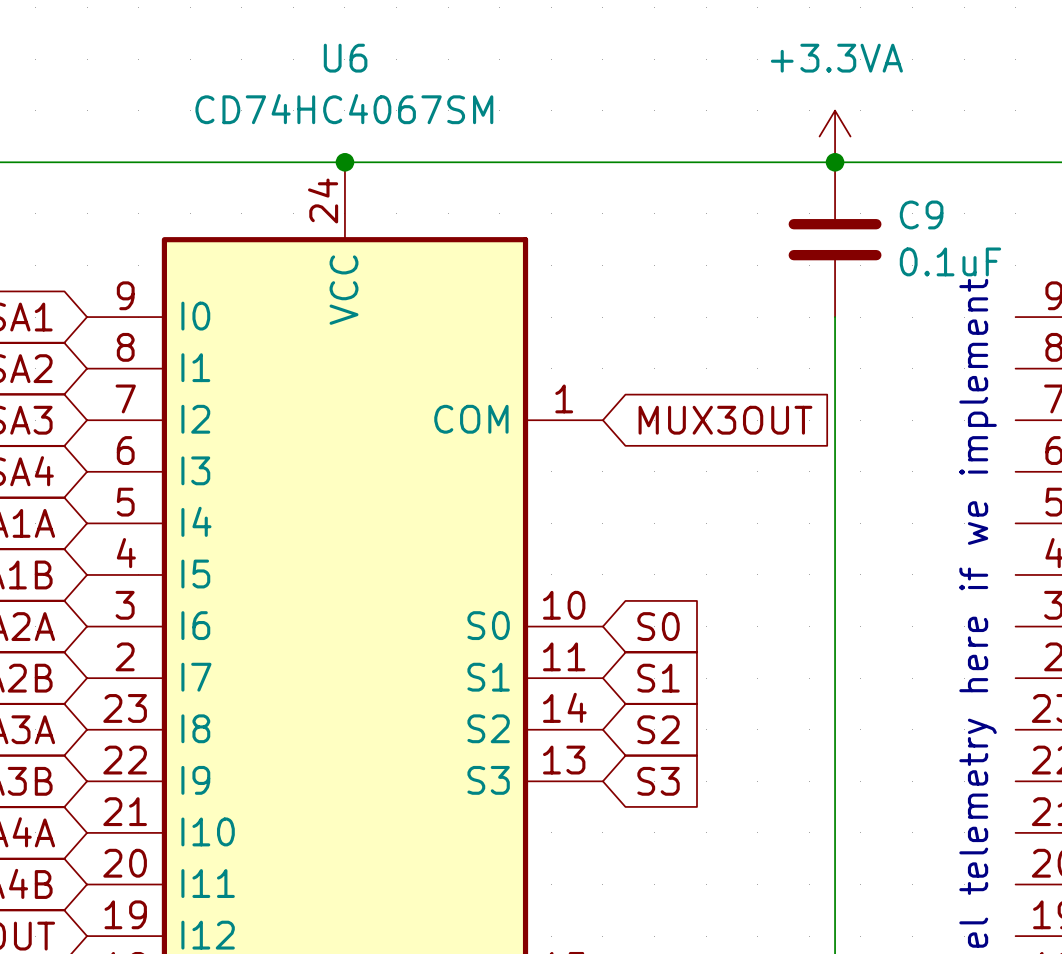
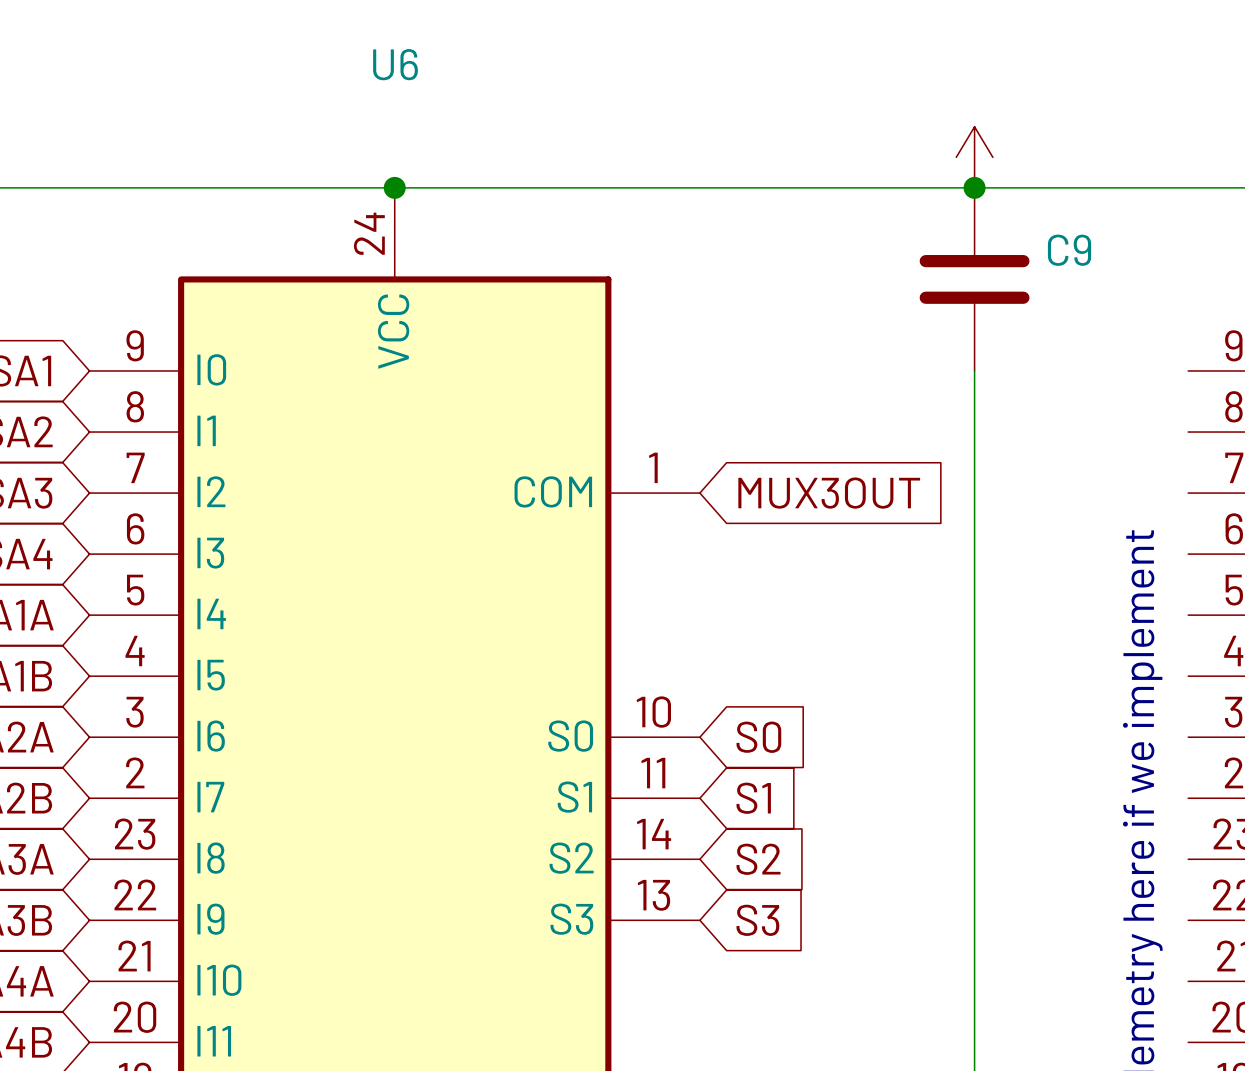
power symbol text: +3.3VA (836, 58) -> none
U6 value: CD74HC4067SM (344, 109) -> none
C9 value: 0.1uF (950, 261) -> none

